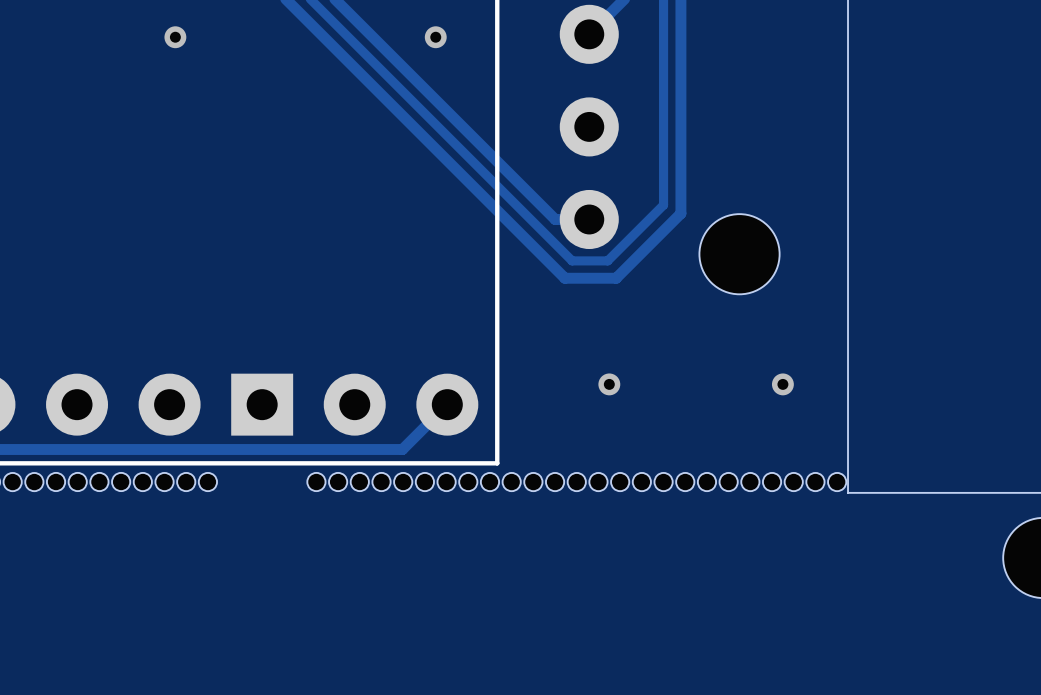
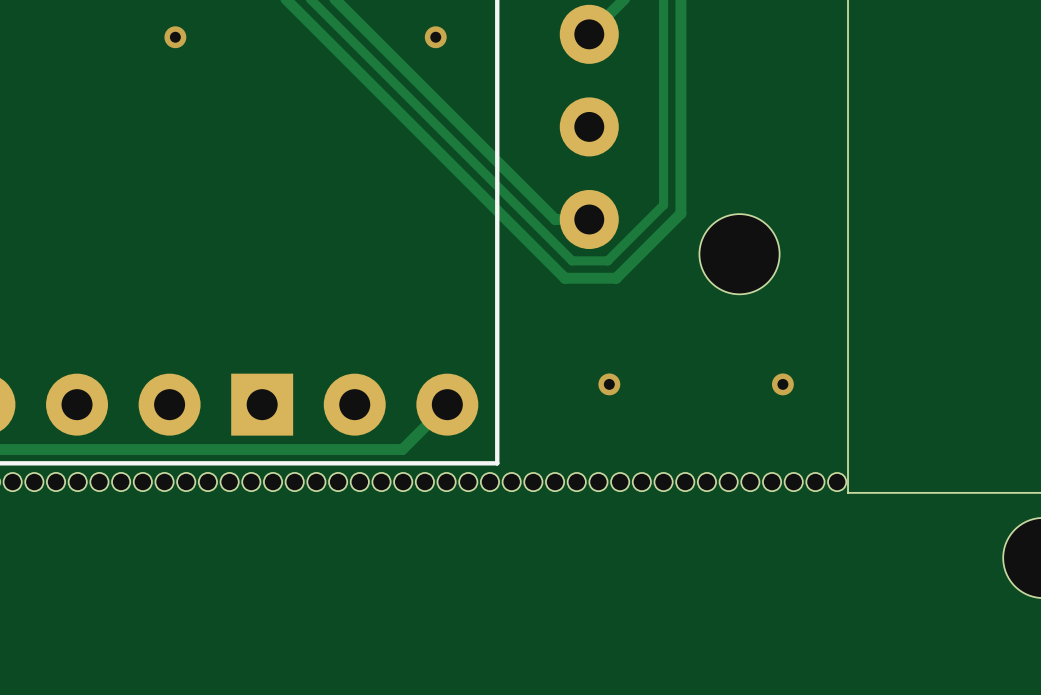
part: none -> (262, 482)

